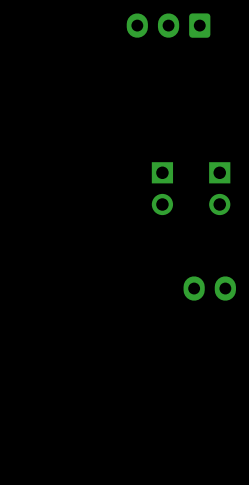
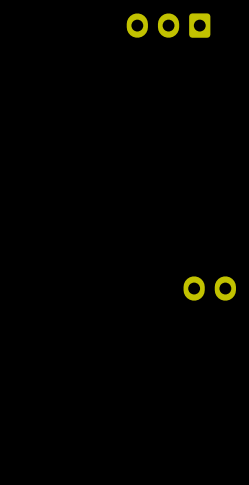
part: (162, 188) -> none
part: (219, 188) -> none

